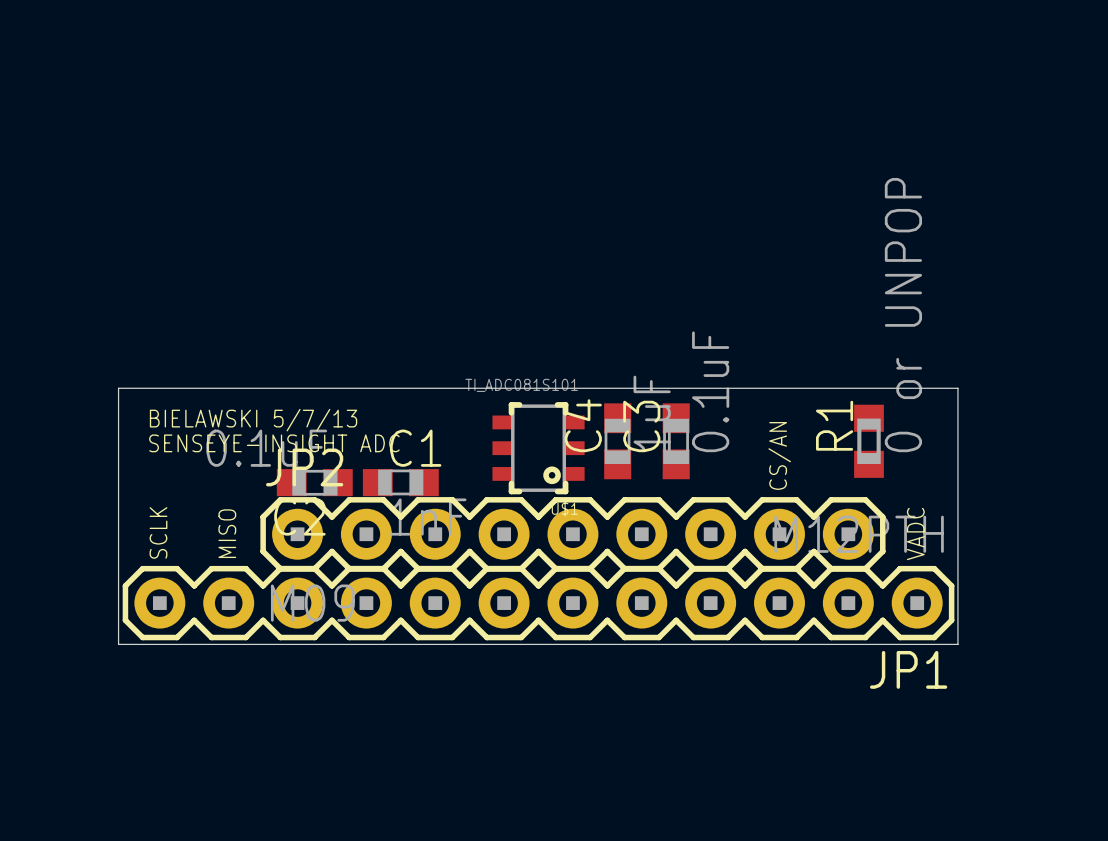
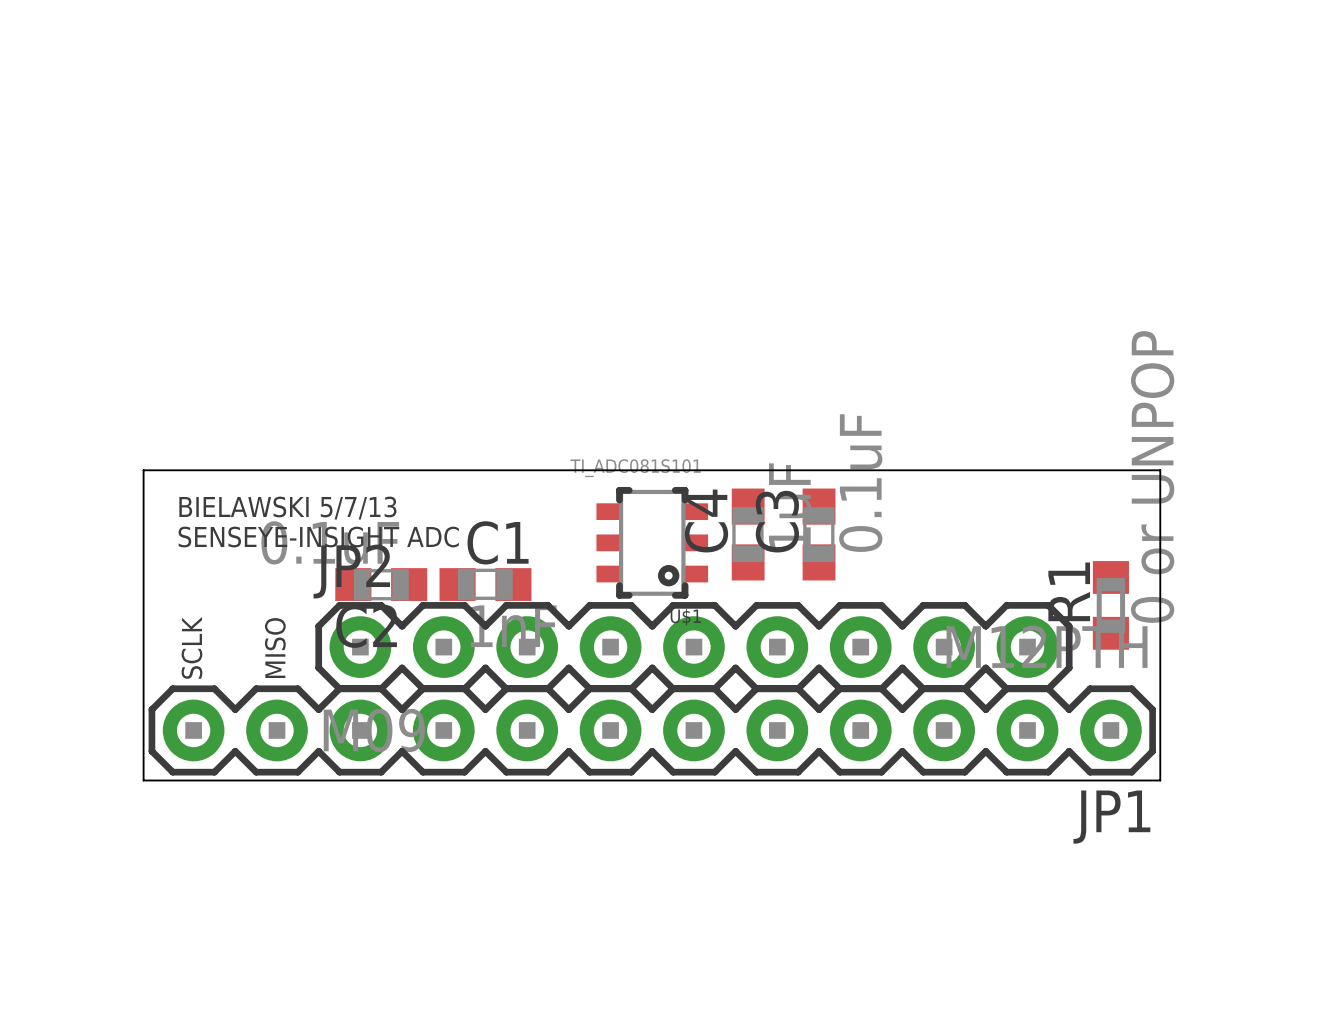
R1 position: (869, 441) -> (1110, 605)
text: CS/AN (779, 455) -> none
text: VADC (915, 534) -> none

